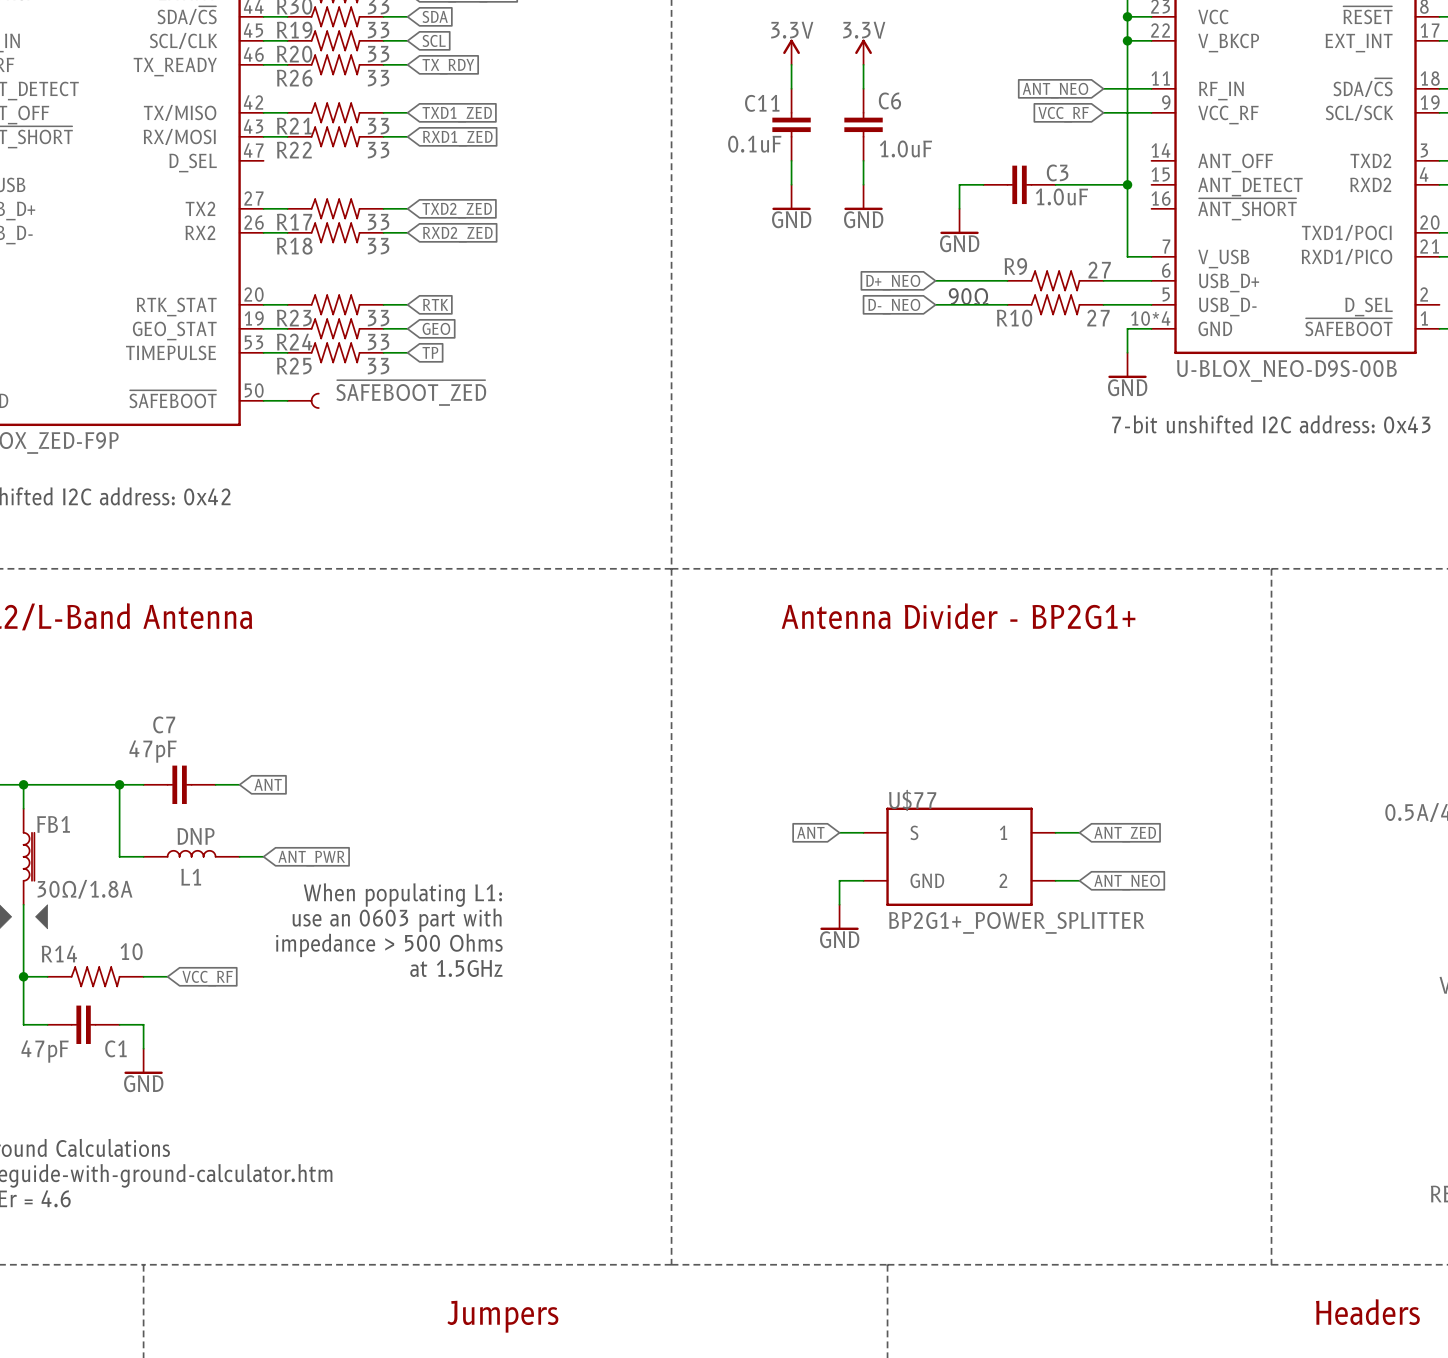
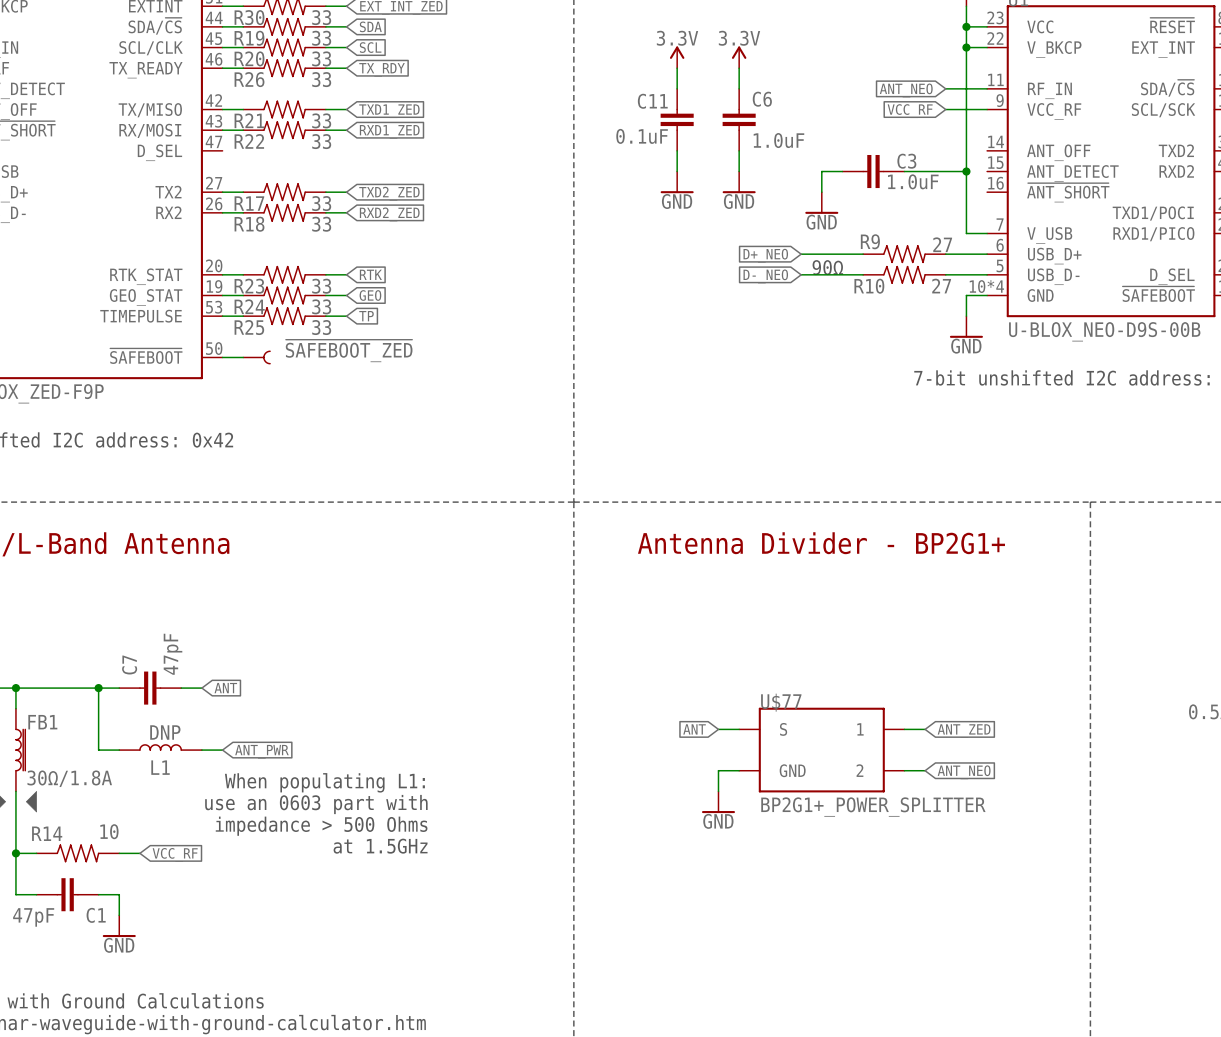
C7 name rotation: 0° (164, 724) -> 90° counterclockwise (129, 665)
C7 value rotation: 0° (153, 751) -> 90° counterclockwise (173, 654)

